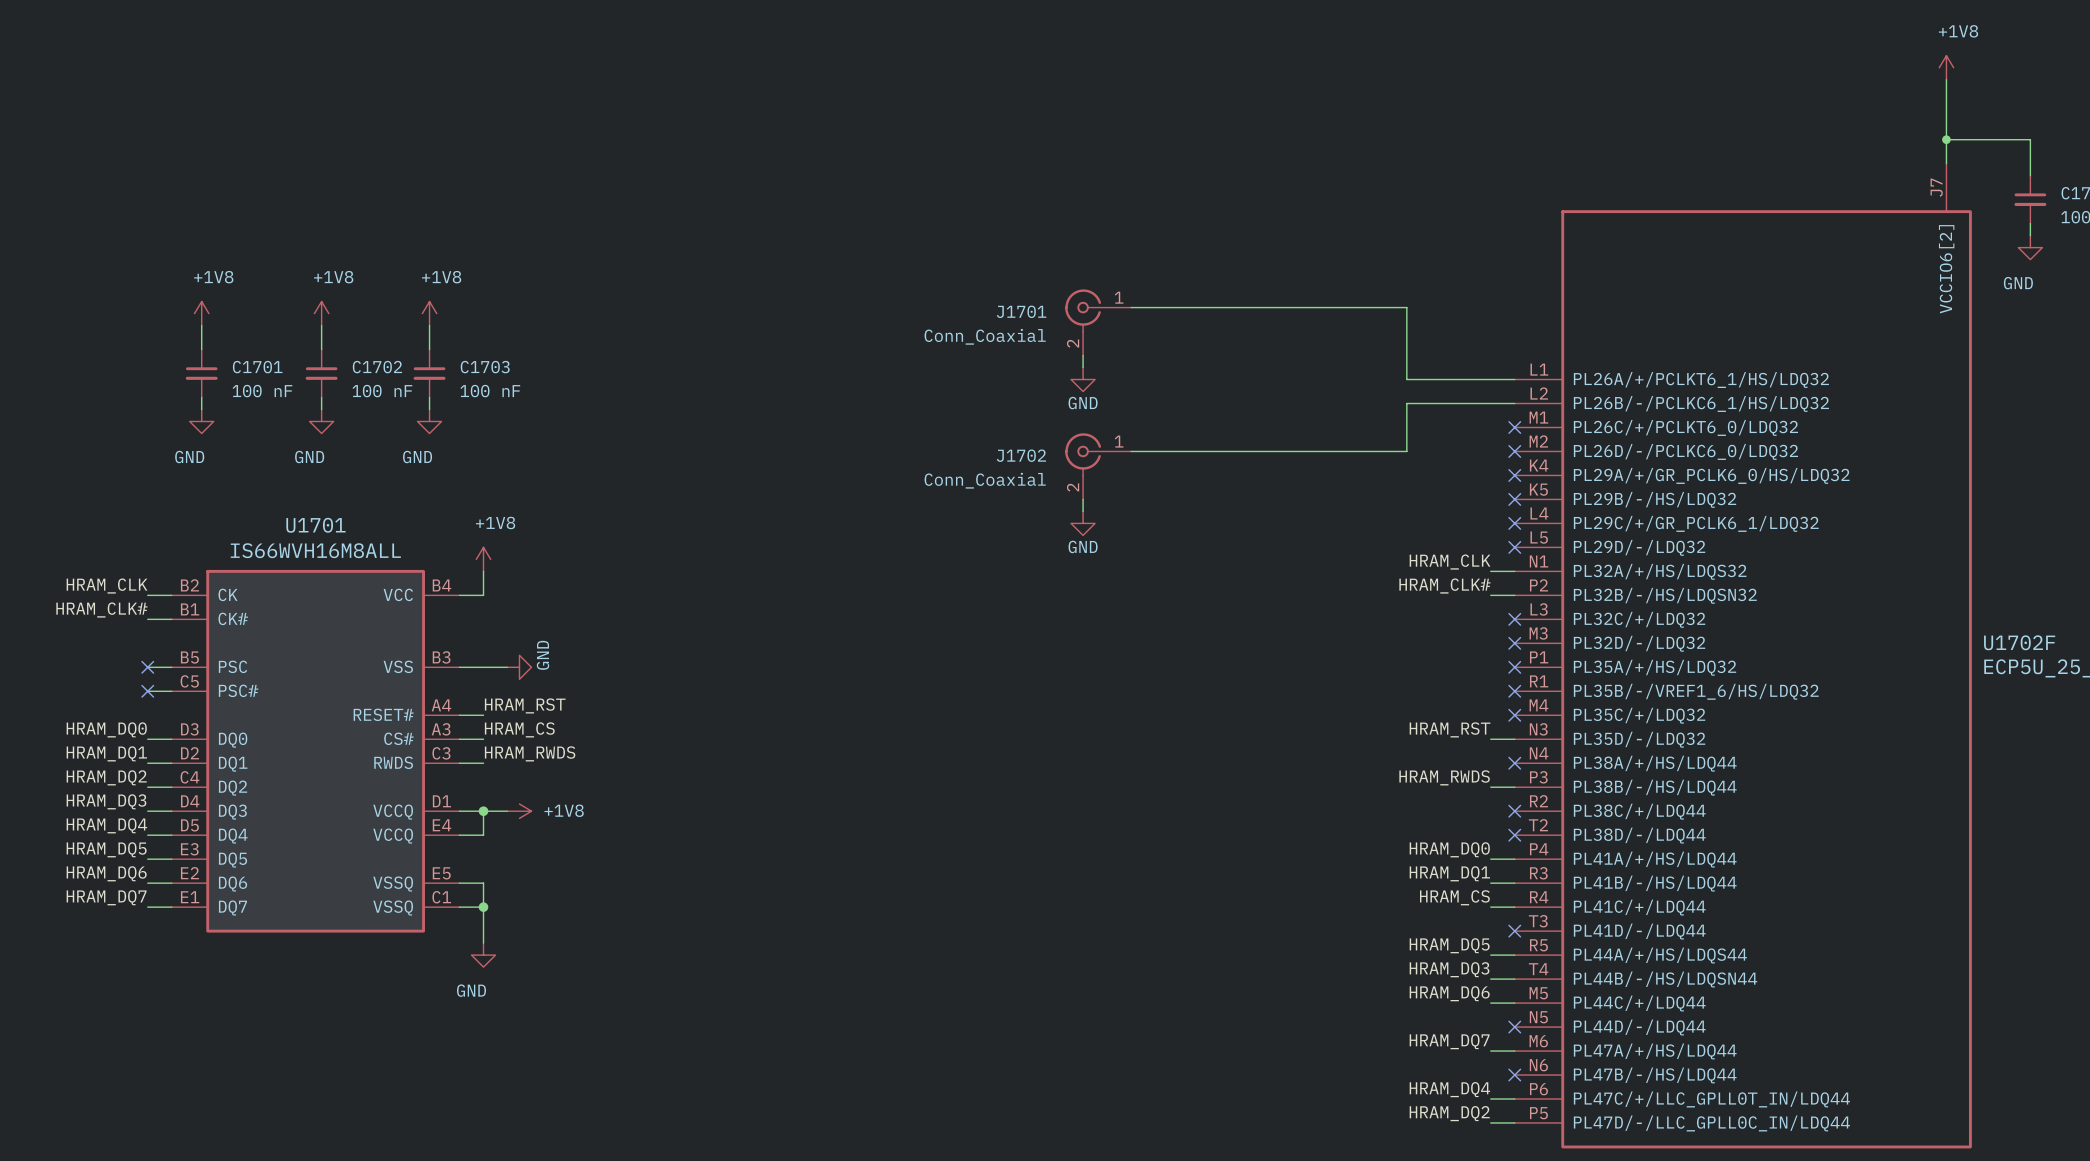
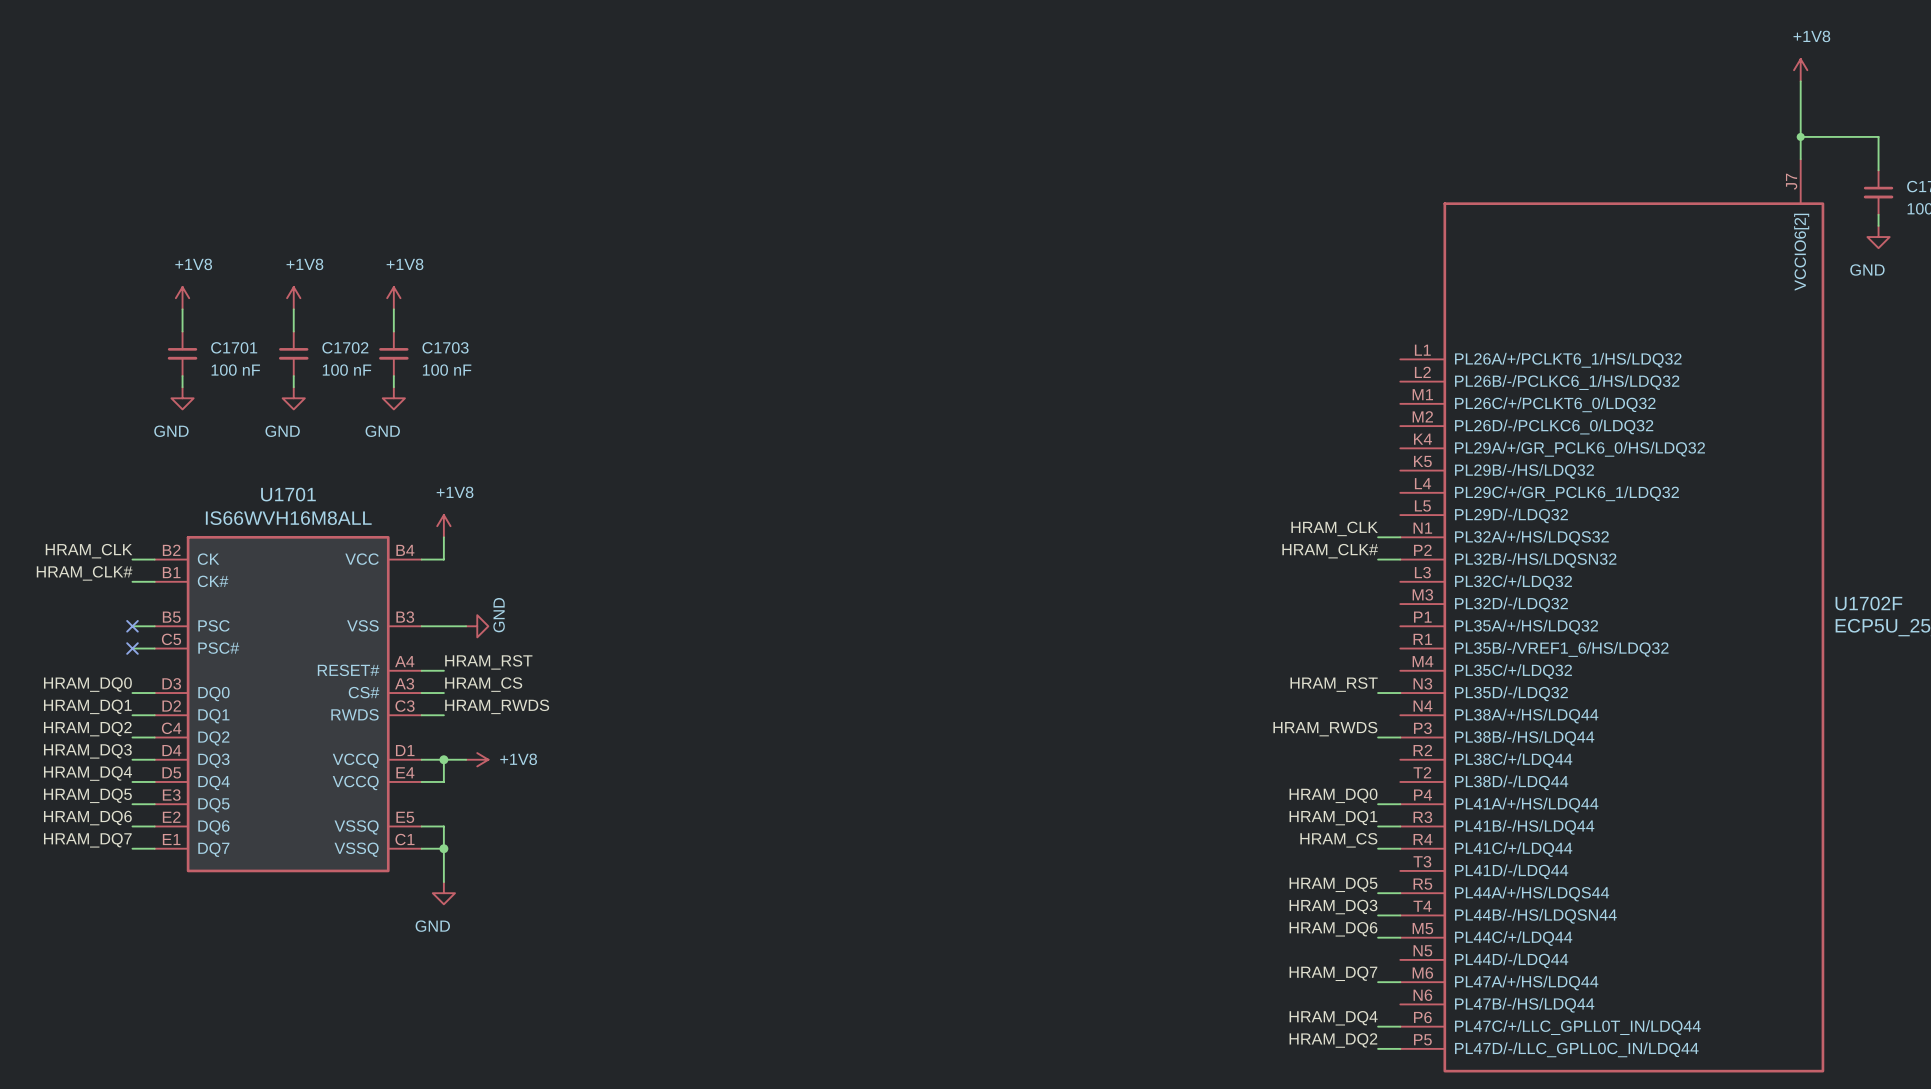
wire: (1131, 307) (1406, 307) (1406, 379) (1514, 379) -> none
J1701: Conn_Coaxial (1098, 322) -> none
wire: (1083, 355) (1083, 367) -> none
power symbol: GND (1083, 379) -> none
wire: (1514, 403) (1406, 403) (1406, 451) (1131, 451) -> none
no-connect mark: (1514, 427) -> none
no-connect mark: (1514, 451) -> none
J1702: Conn_Coaxial (1098, 466) -> none
no-connect mark: (1514, 475) -> none
wire: (1083, 499) (1083, 511) -> none
no-connect mark: (1514, 499) -> none
power symbol: GND (1083, 523) -> none
no-connect mark: (1514, 523) -> none
no-connect mark: (1514, 547) -> none
no-connect mark: (1514, 619) -> none
no-connect mark: (1514, 643) -> none
no-connect mark: (1514, 667) -> none
no-connect mark: (1514, 691) -> none
no-connect mark: (1514, 715) -> none
no-connect mark: (1514, 763) -> none
no-connect mark: (1514, 811) -> none
no-connect mark: (1514, 835) -> none
no-connect mark: (1514, 931) -> none
no-connect mark: (1514, 1027) -> none
no-connect mark: (1514, 1075) -> none

